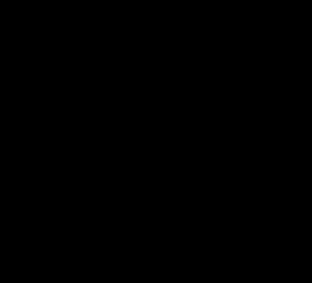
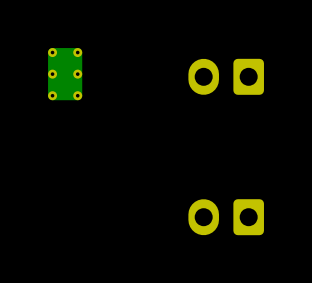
part: none -> (65, 74)
part: none -> (226, 76)
part: none -> (226, 217)

